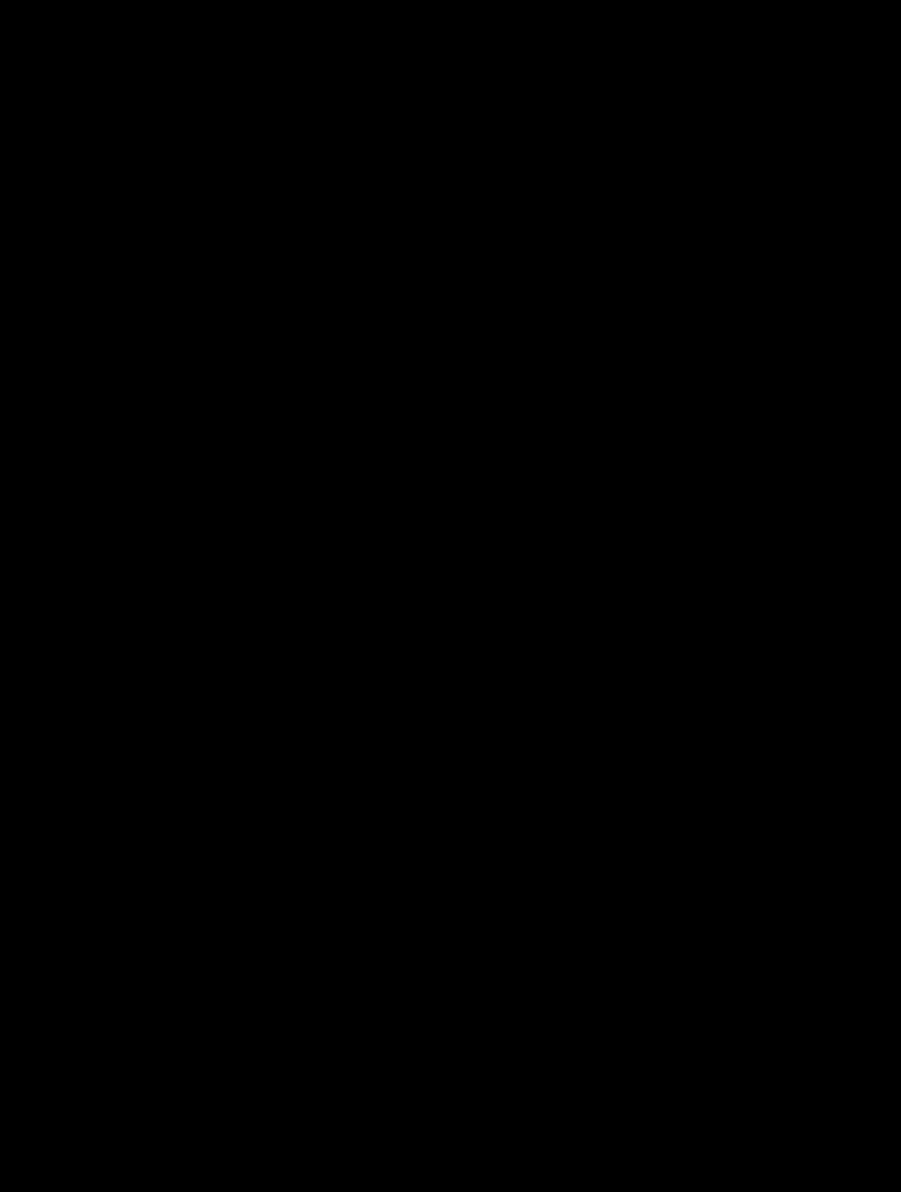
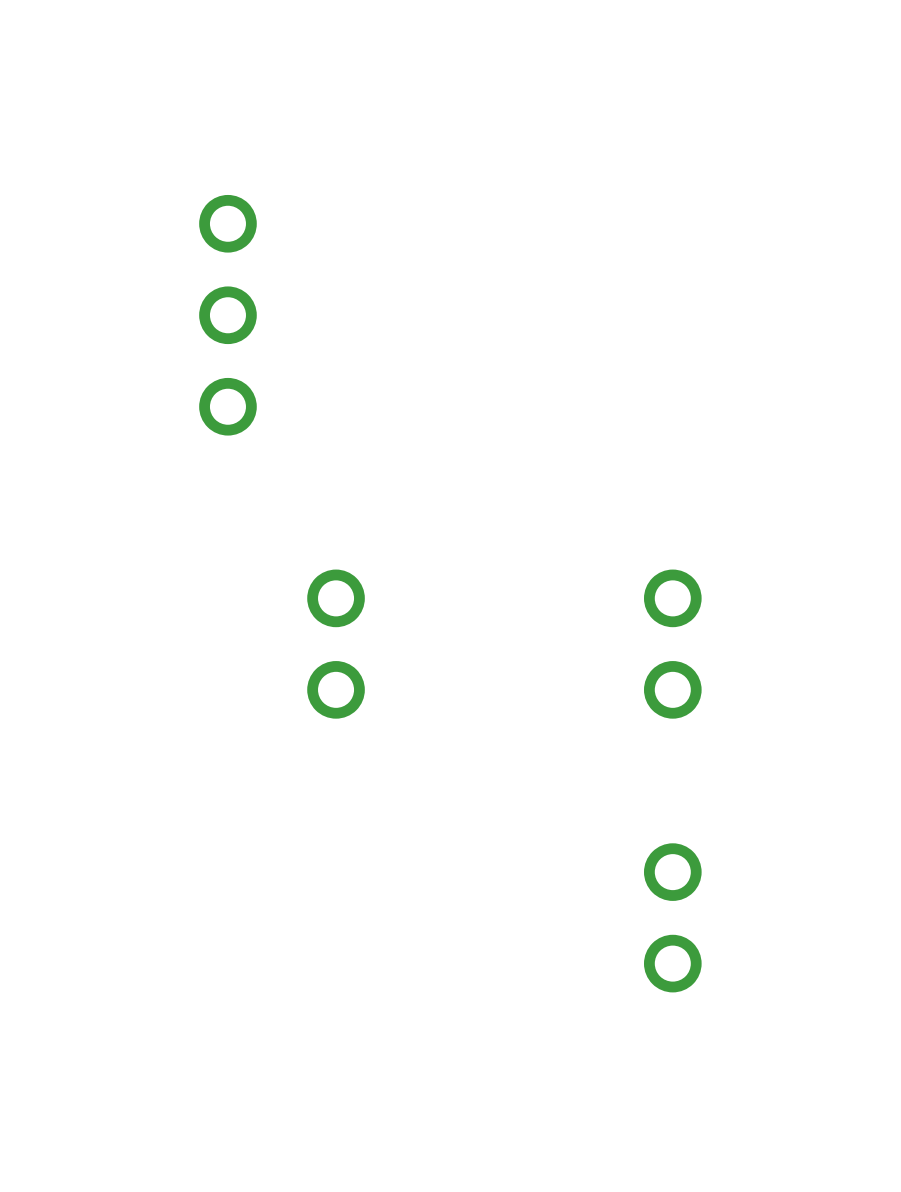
part: none -> (227, 315)
part: none -> (336, 644)
part: none -> (672, 644)
part: none -> (672, 917)

